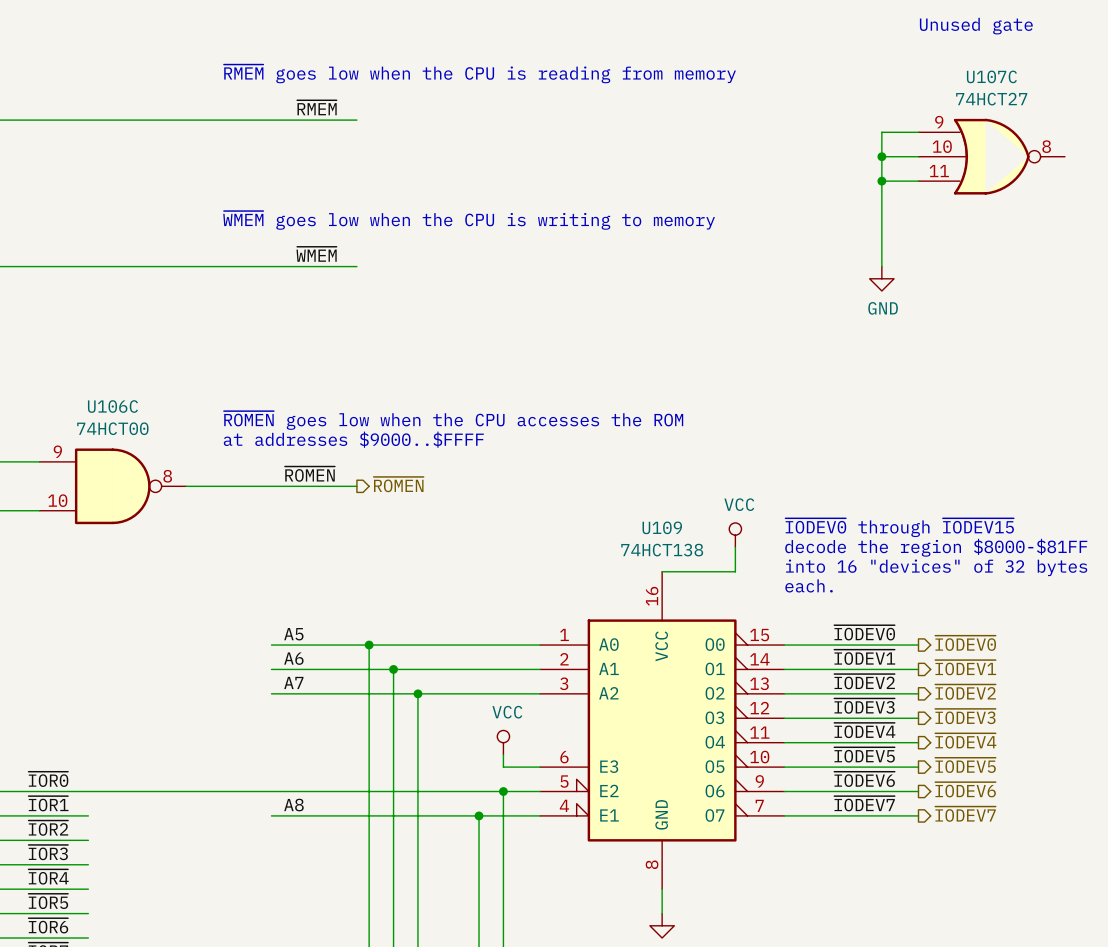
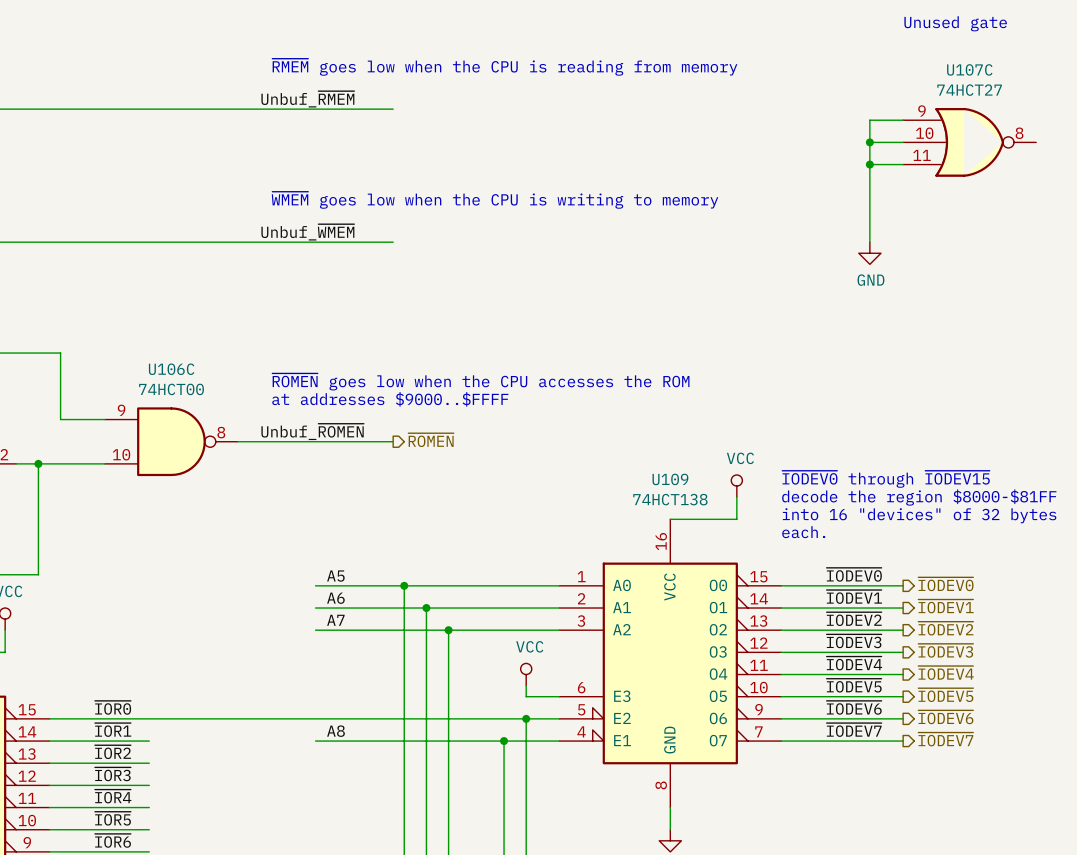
label: ~{RMEM} (316, 107) -> Unbuf_~{RMEM} (307, 99)
label: ~{WMEM} (316, 254) -> Unbuf_~{WMEM} (307, 232)
label: ~{ROMEN} (309, 474) -> Unbuf_~{ROMEN} (312, 431)

